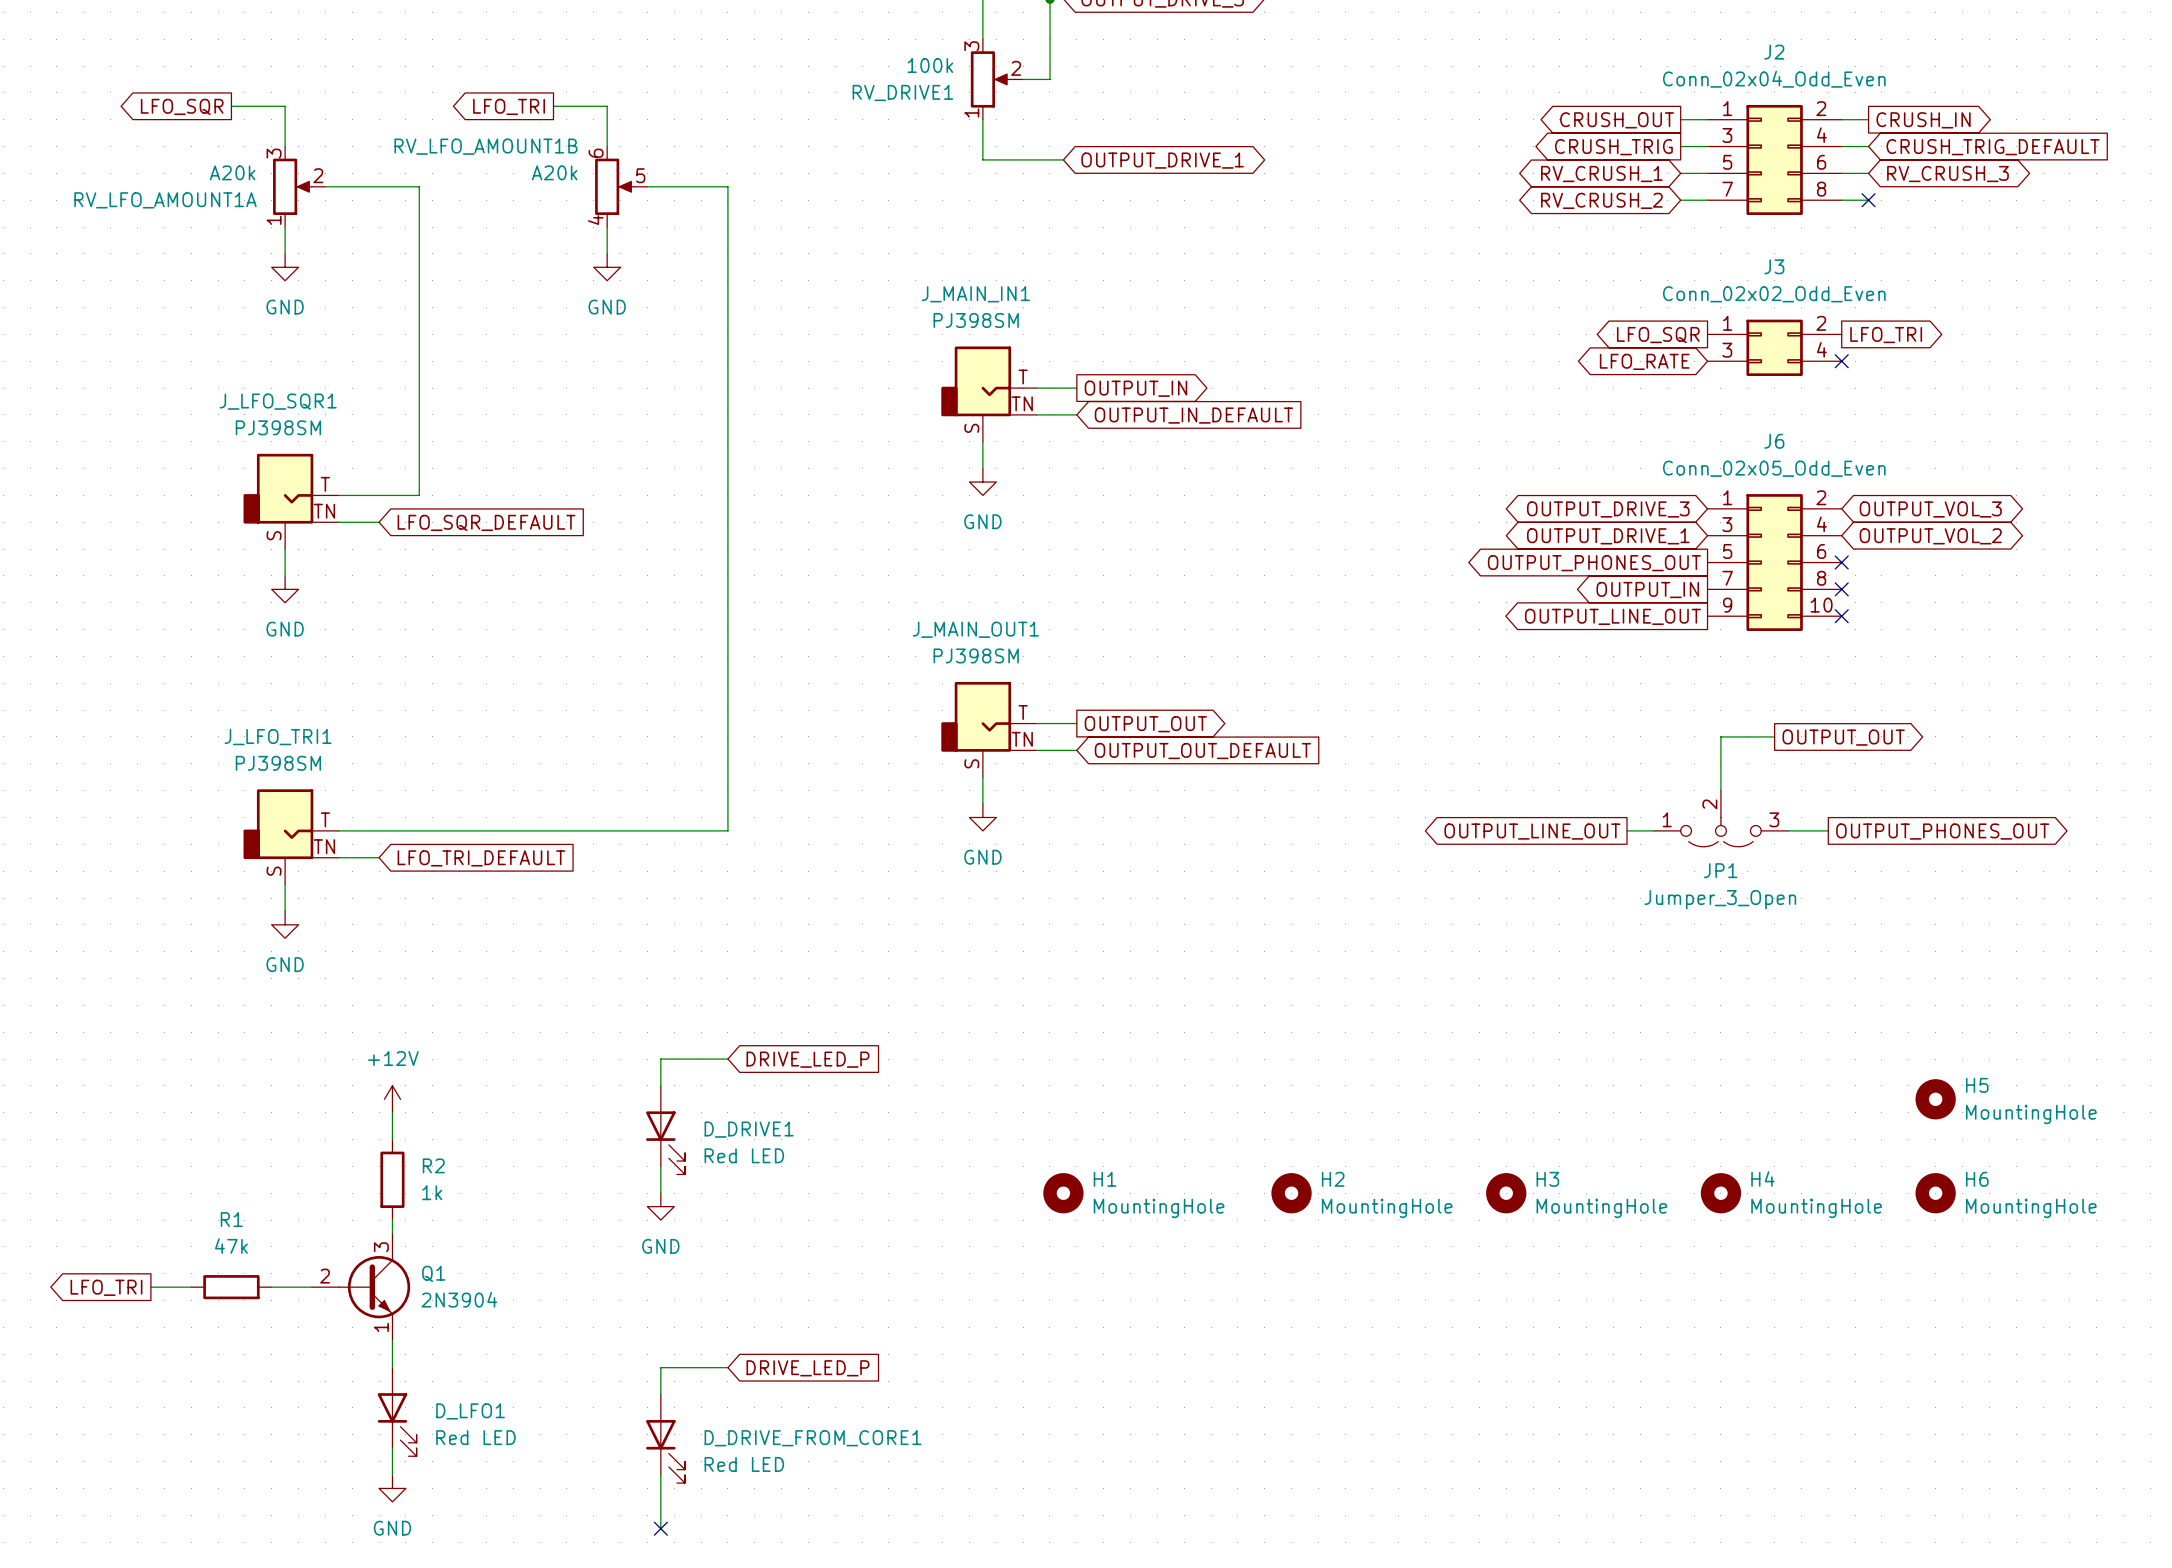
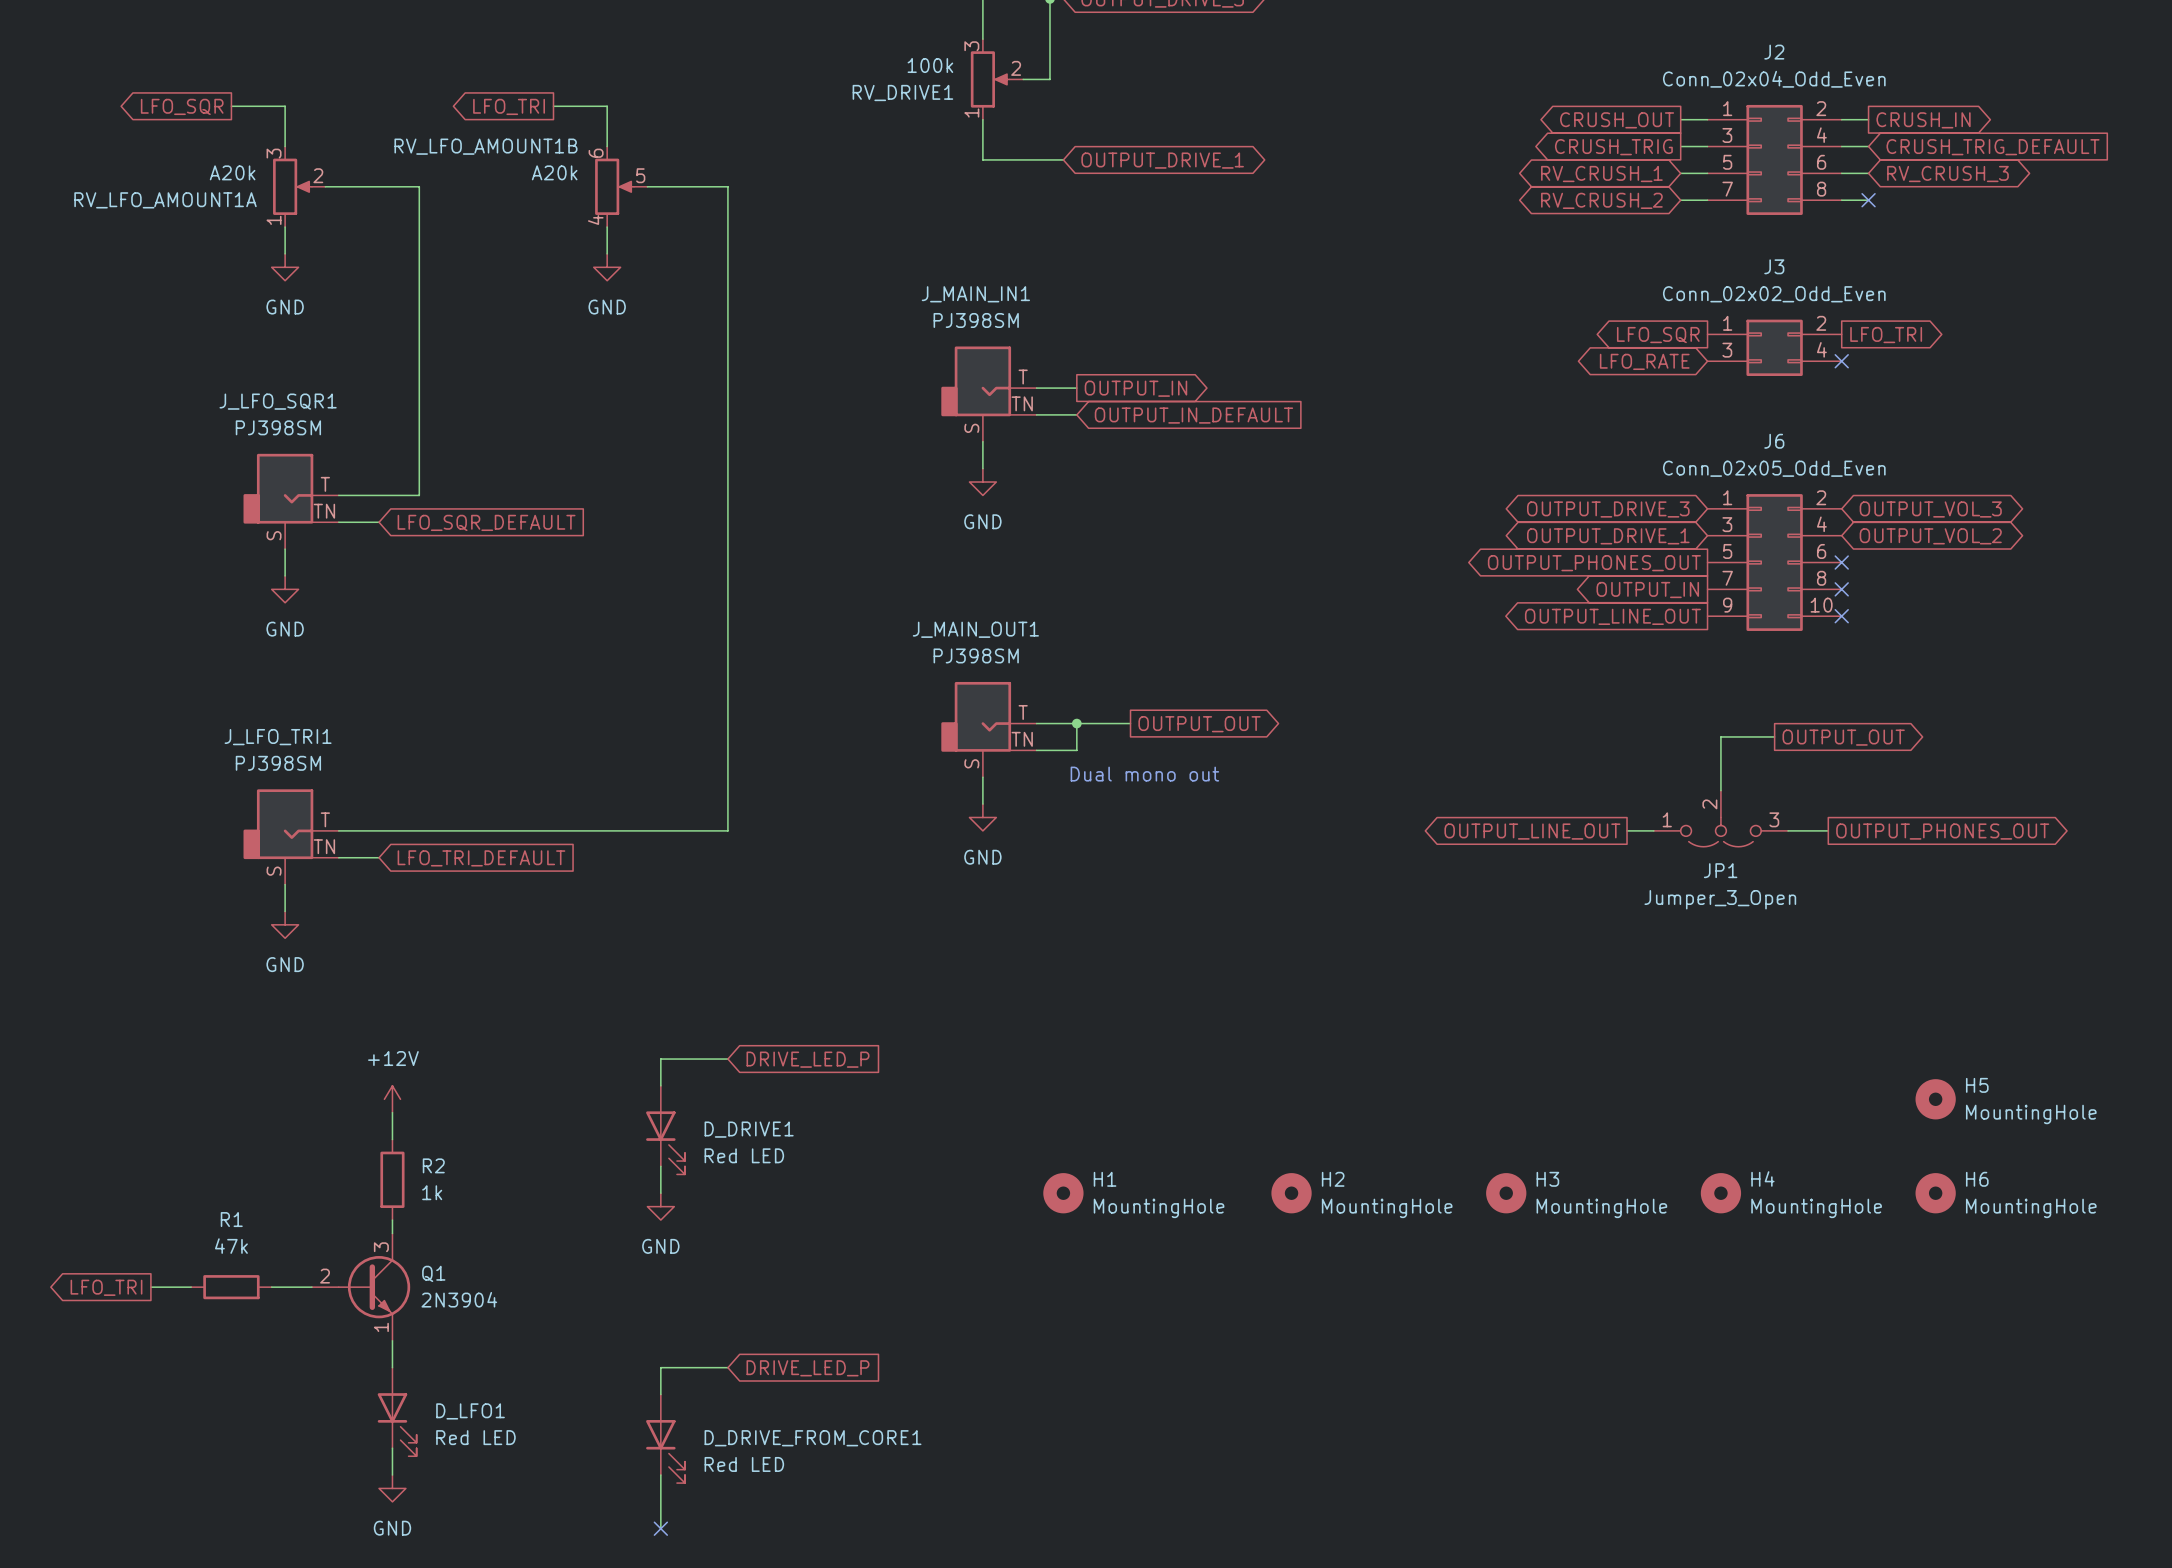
junction: none -> (1076, 723)
wire: none -> (1130, 723) (1076, 723) (1076, 750)
global label position: OUTPUT_OUT (1145, 724) -> OUTPUT_OUT (1199, 724)
global label: OUTPUT_OUT_DEFAULT (1202, 751) -> none
text: none -> Dual mono out (1144, 774)

